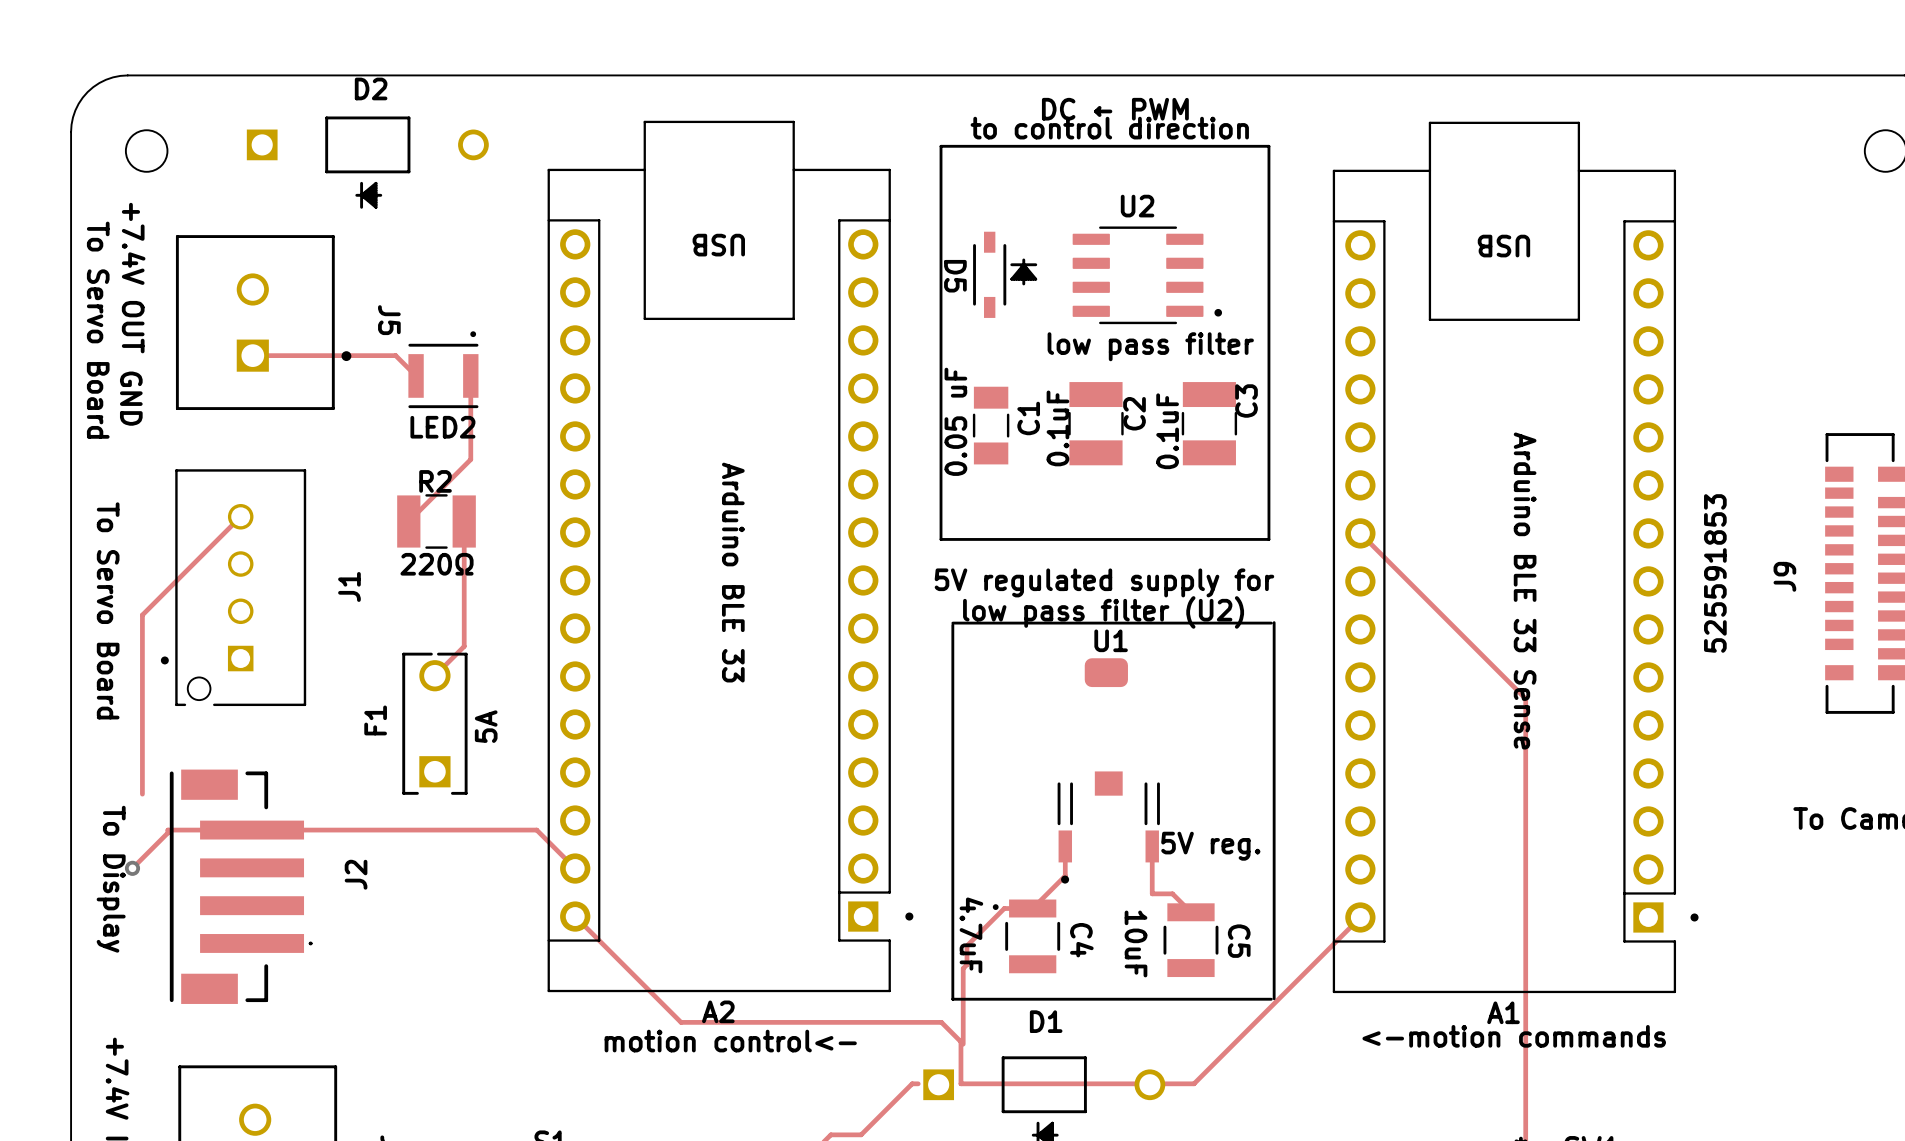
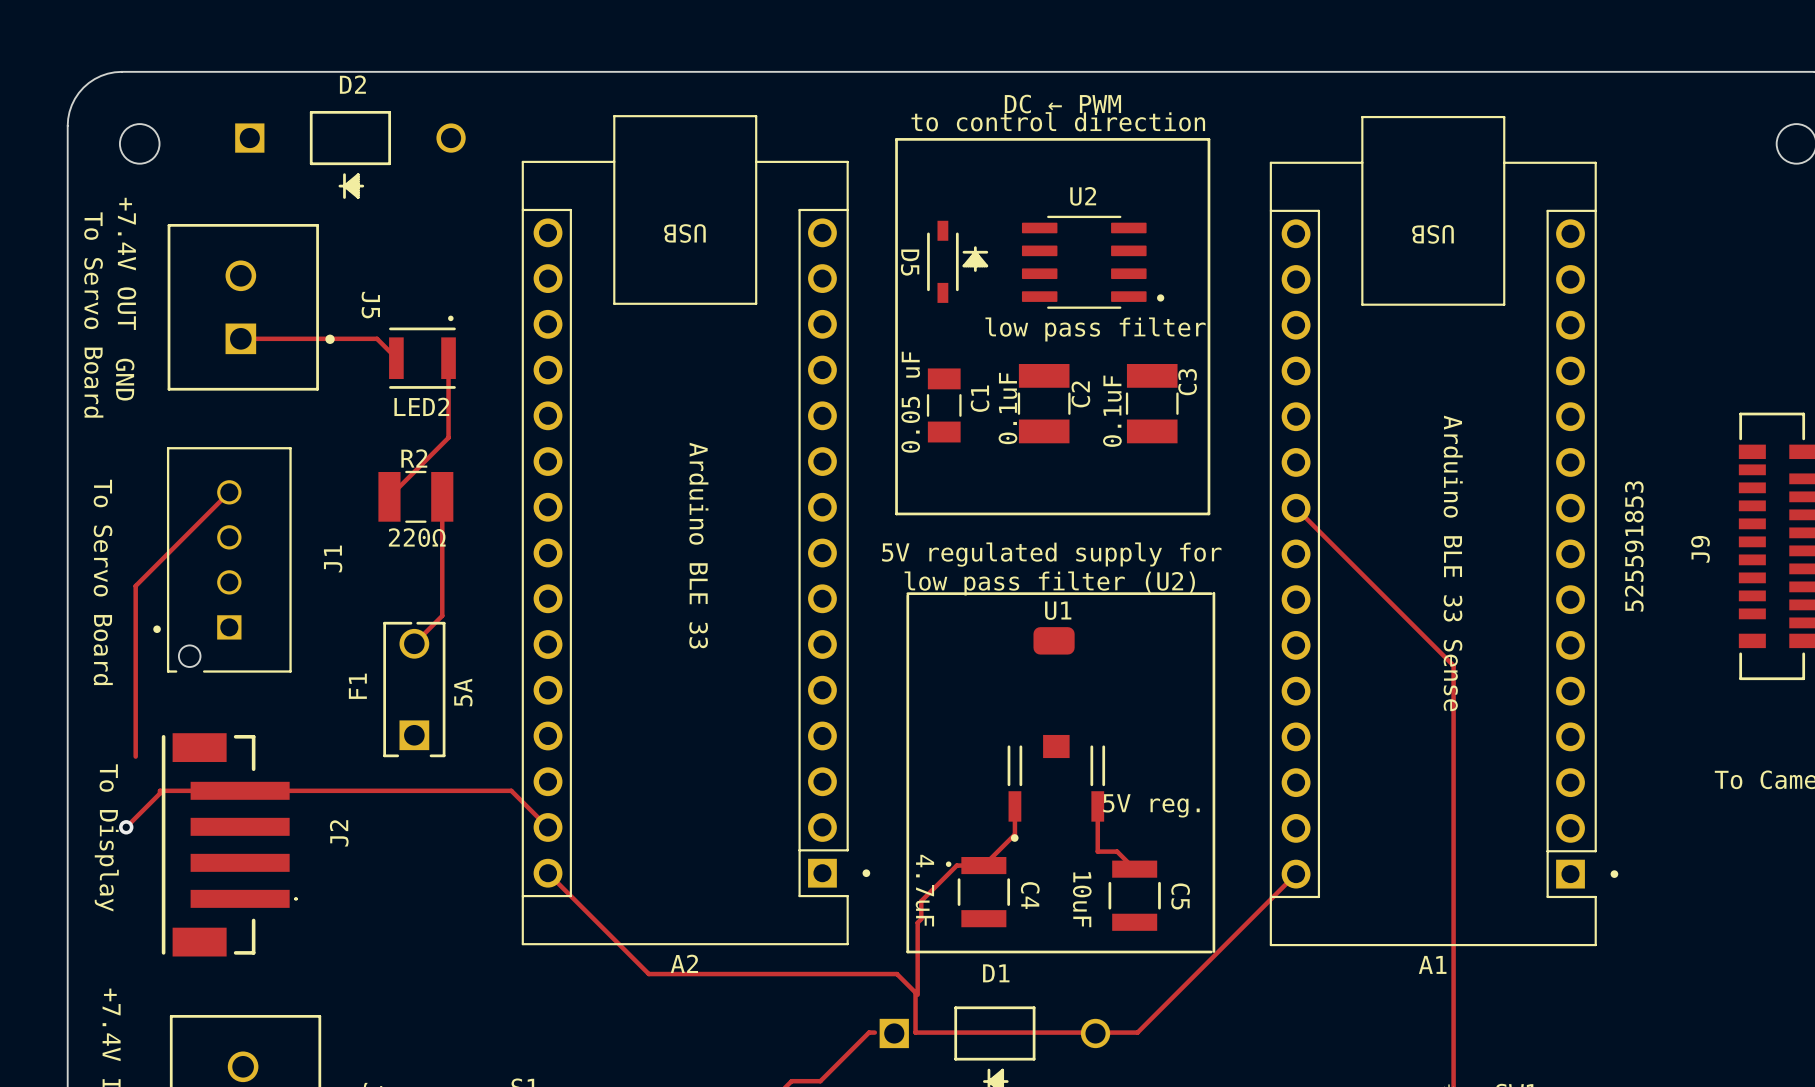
A1 text: <-motion commands (1514, 1036) -> none
A2 text: motion control<- (730, 1041) -> none

